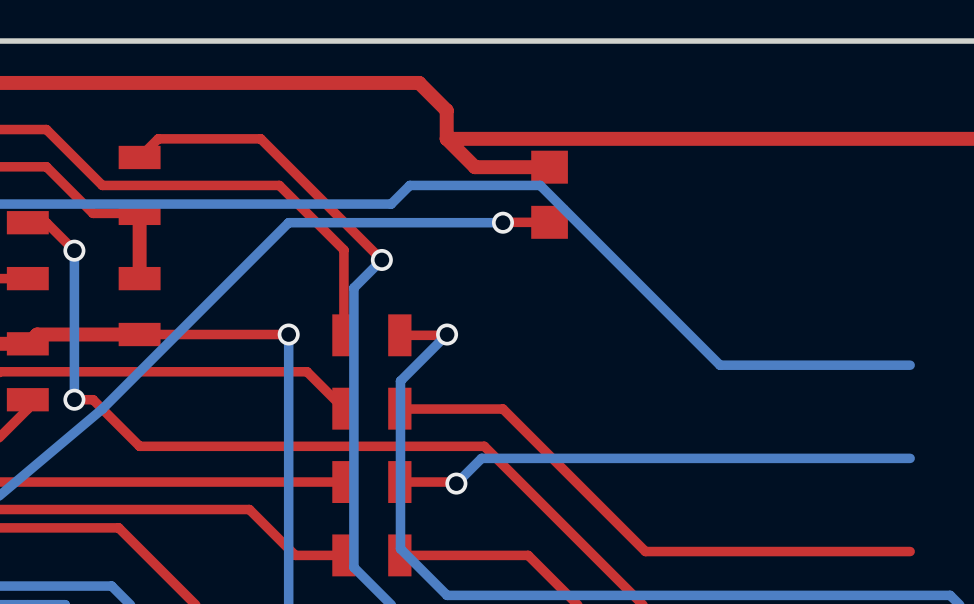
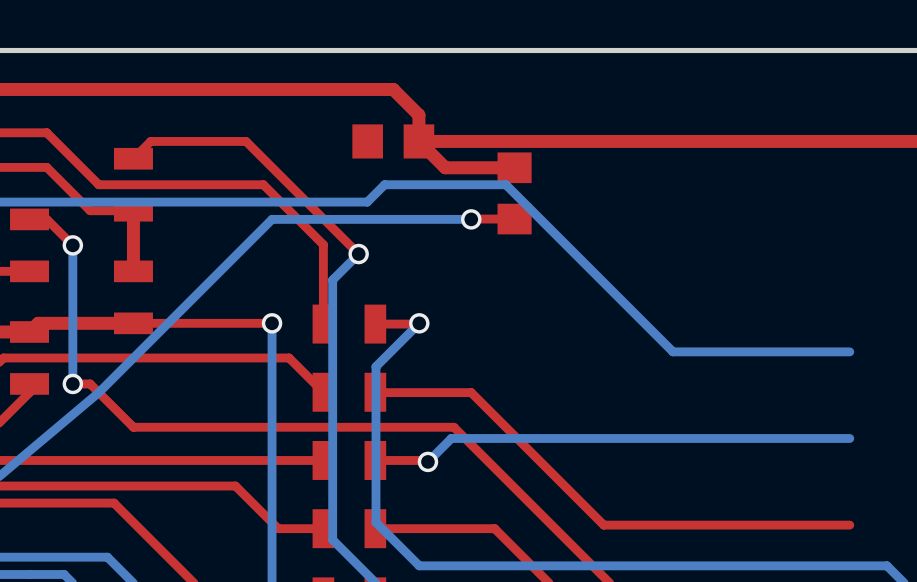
part: none -> (393, 141)

